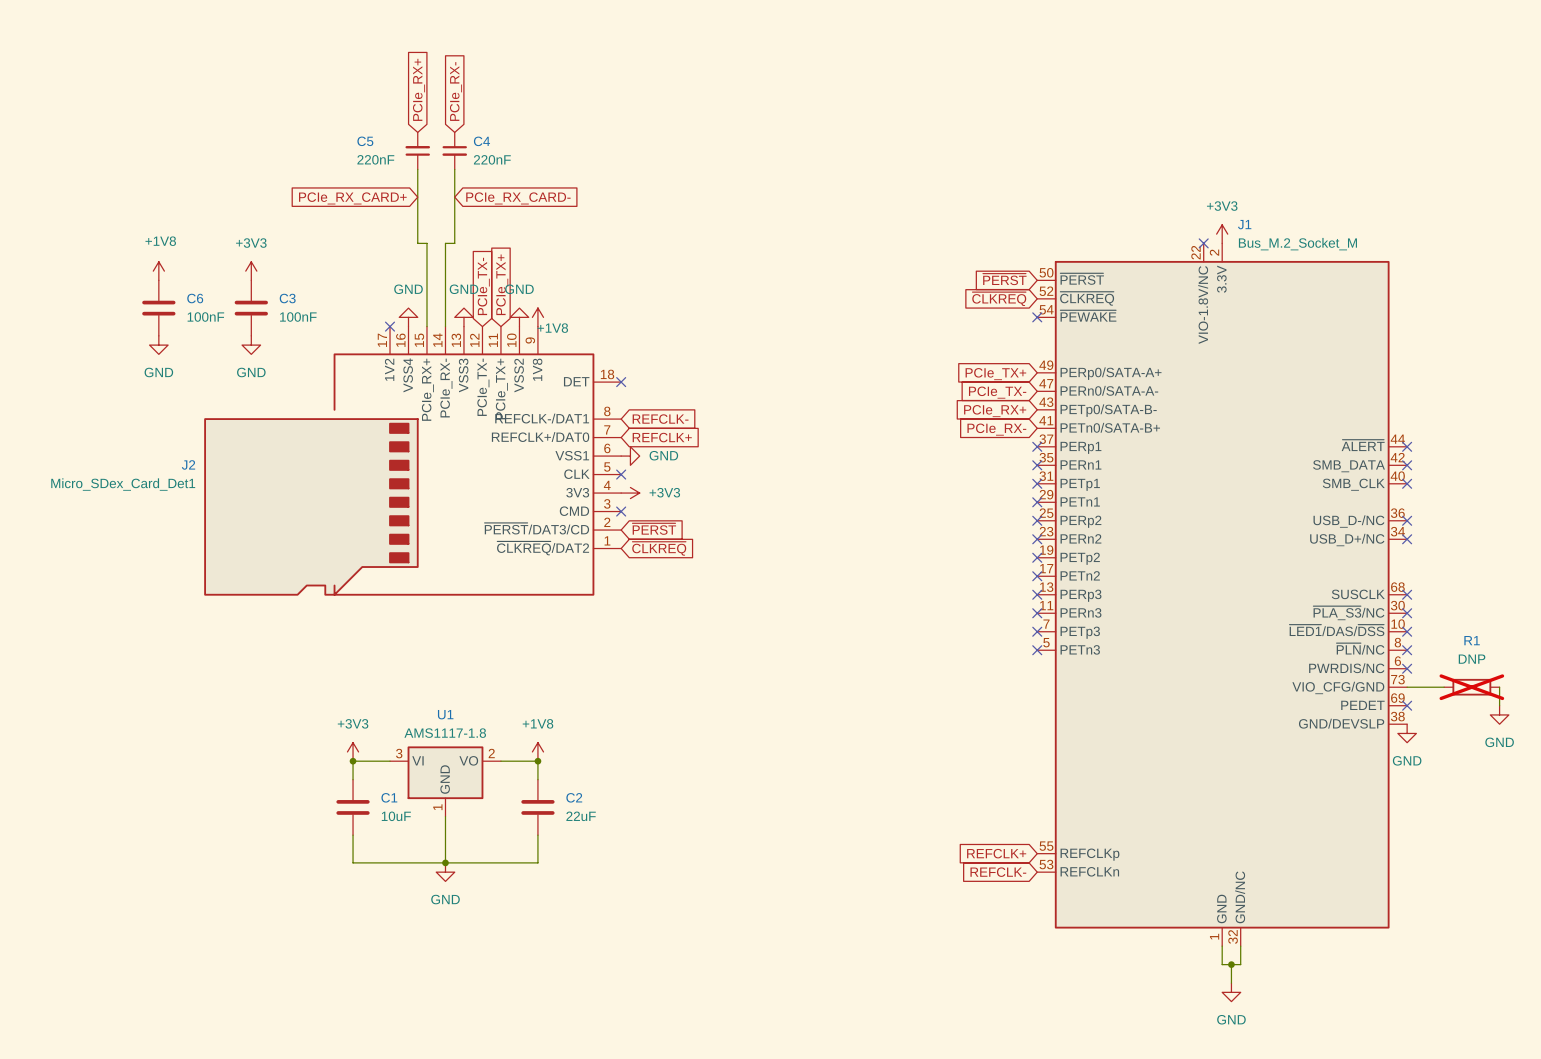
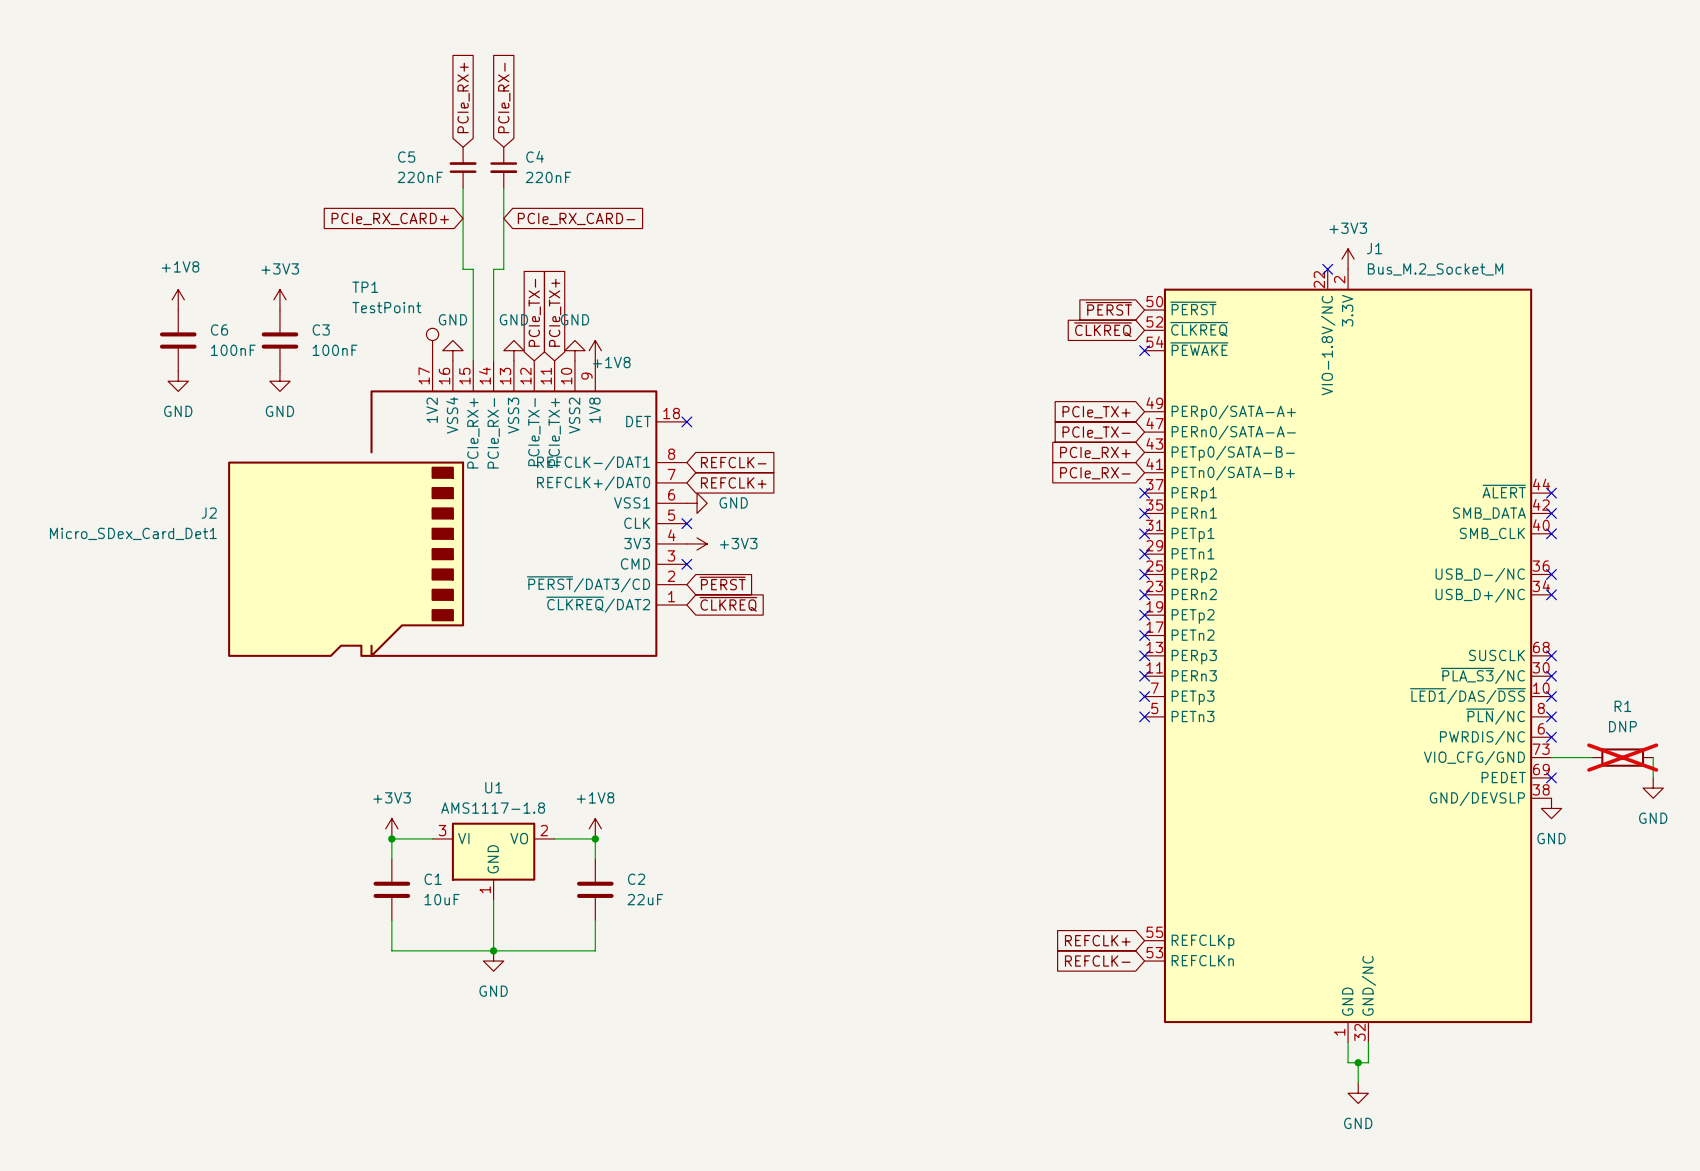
TP1: none -> TestPoint (432, 344)
no-connect mark: (390, 326) -> none

